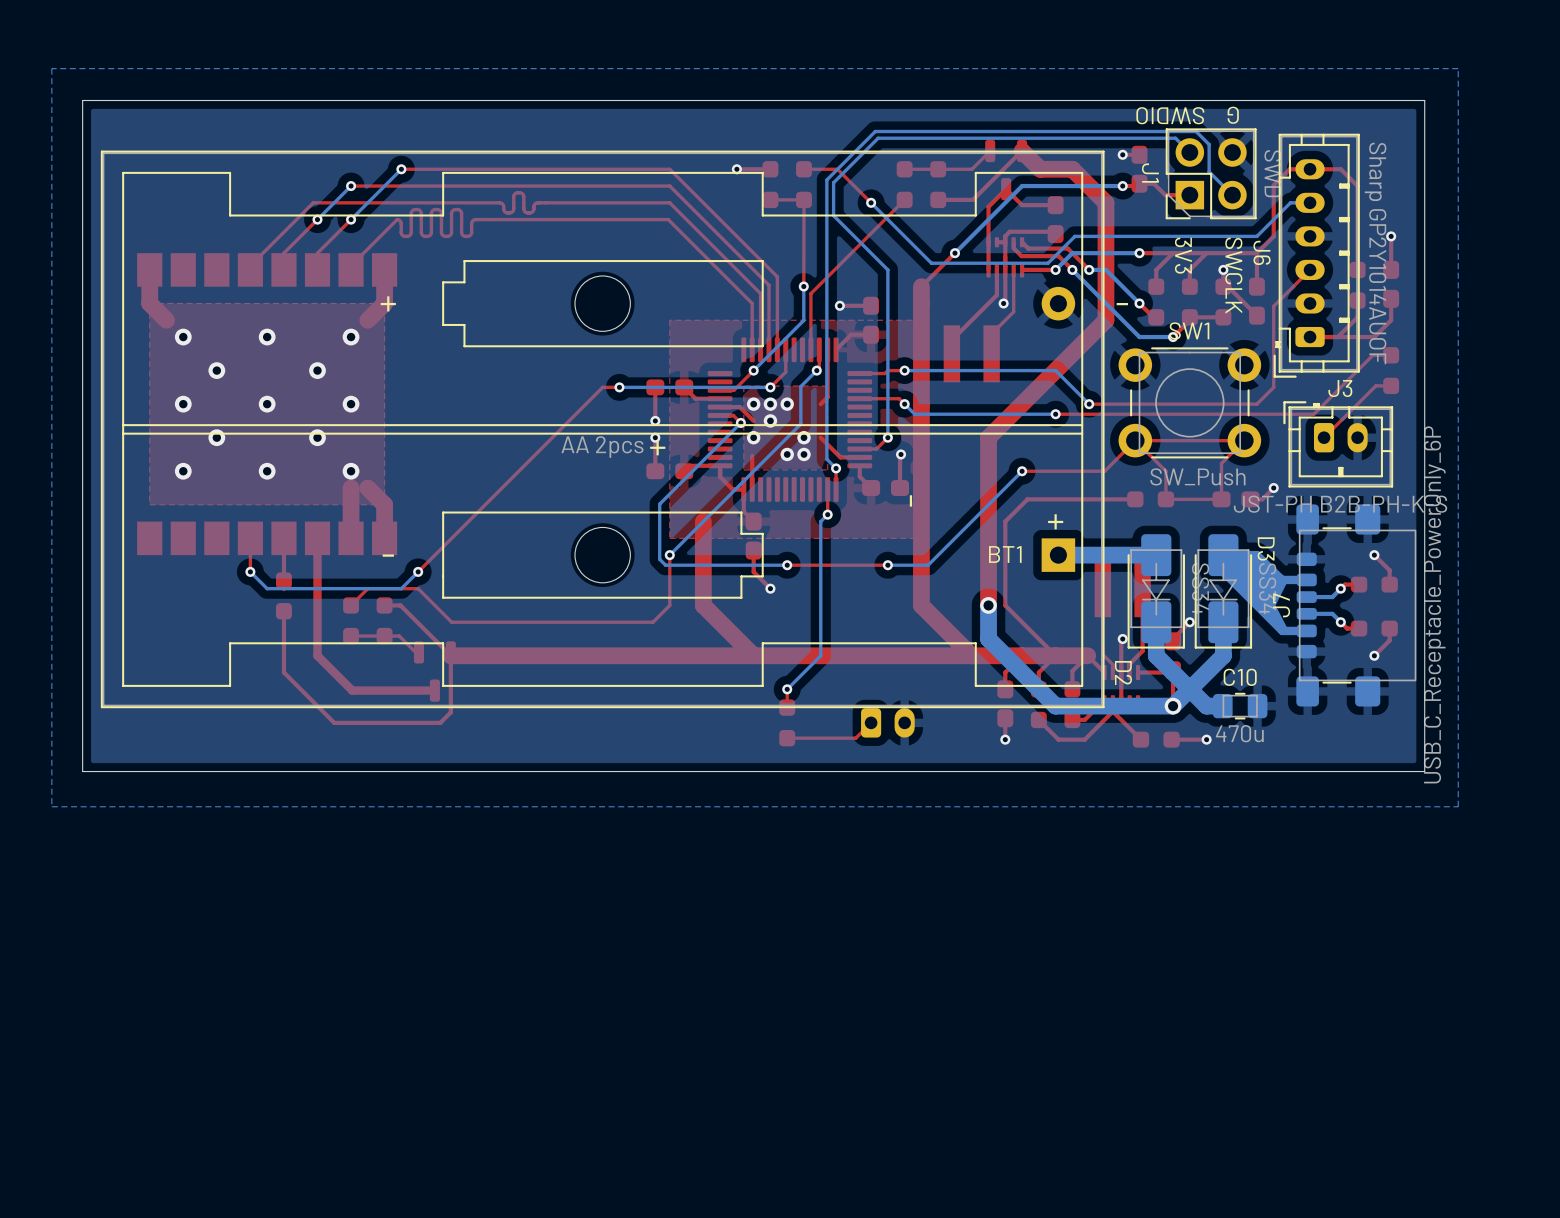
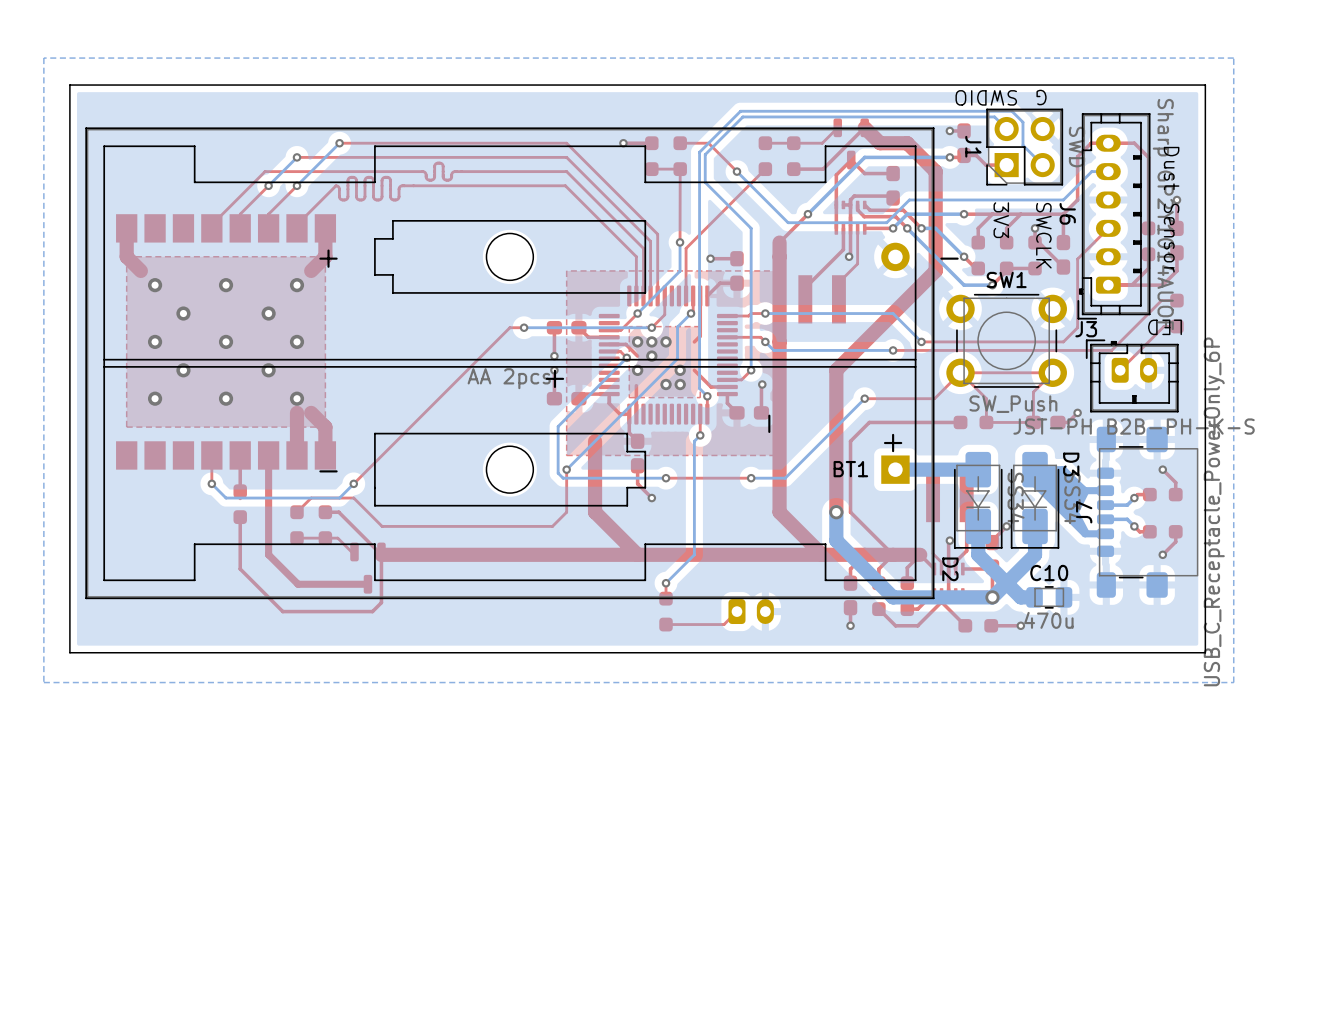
text: none -> Dust Sensor (1171, 209)
text: none -> LED (1165, 327)
J3 name position: J3 (1340, 388) -> J3 (1086, 329)

